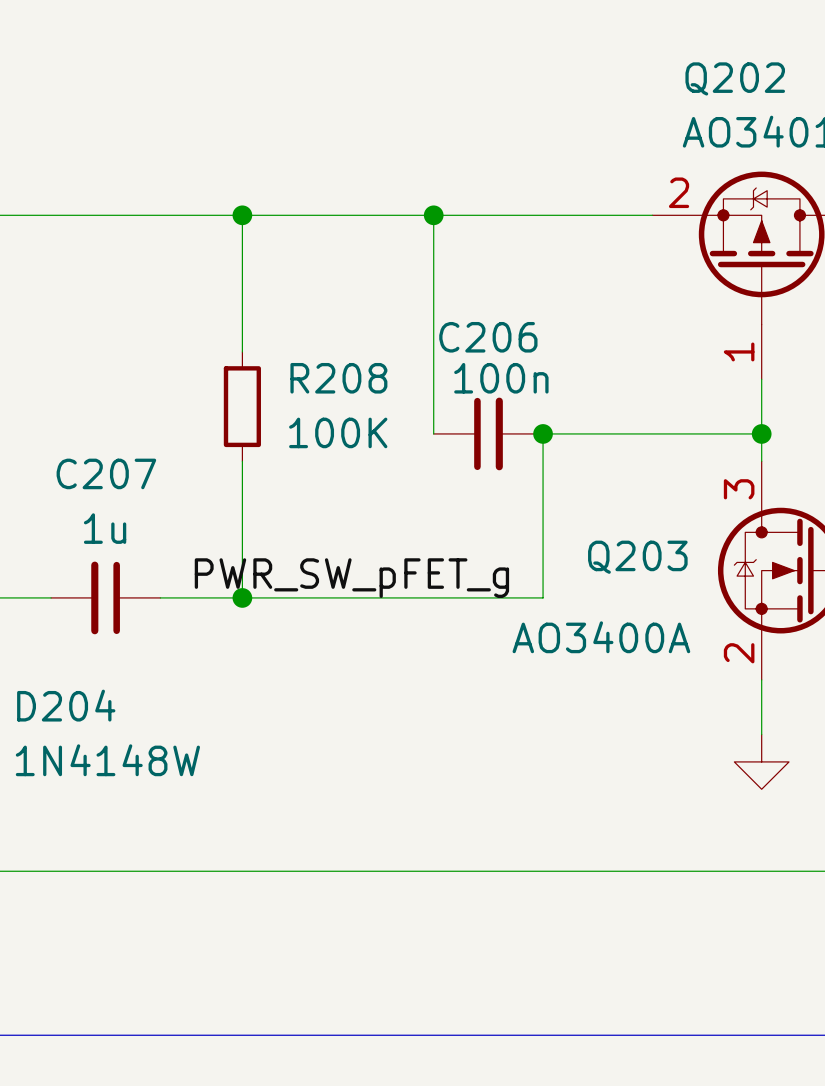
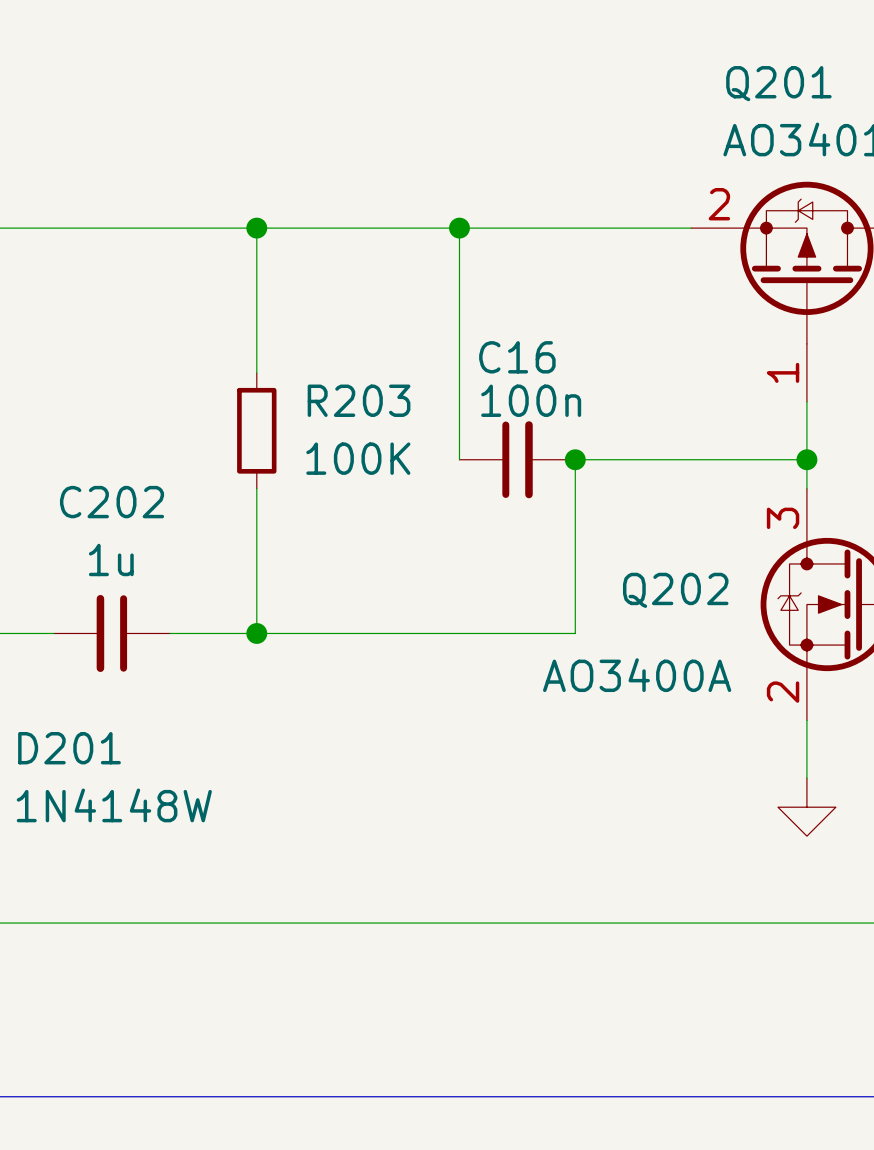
Q202 name: Q202 (735, 78) -> Q201 (778, 83)
C206 name: C206 (488, 337) -> C16 (517, 357)
R208 name: R208 (338, 378) -> R203 (359, 400)
C207 name: C207 (106, 473) -> C202 (112, 502)
Q203 name: Q203 (637, 557) -> Q202 (675, 590)
label: PWR_SW_pFET_g (351, 578) -> none
D204 name: D204 (66, 705) -> D201 (69, 748)

